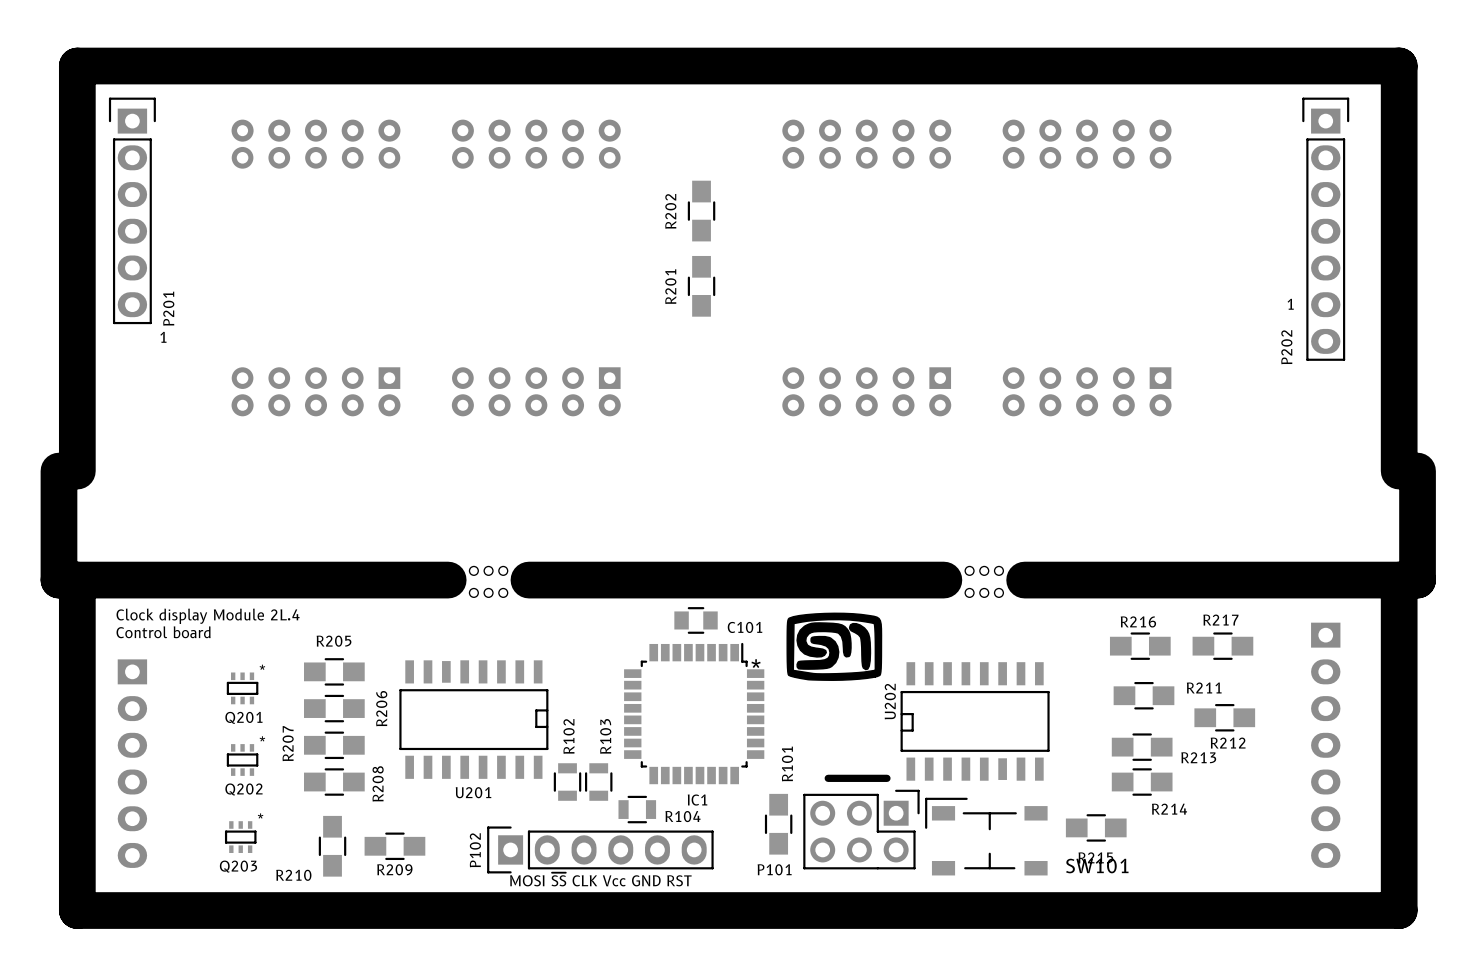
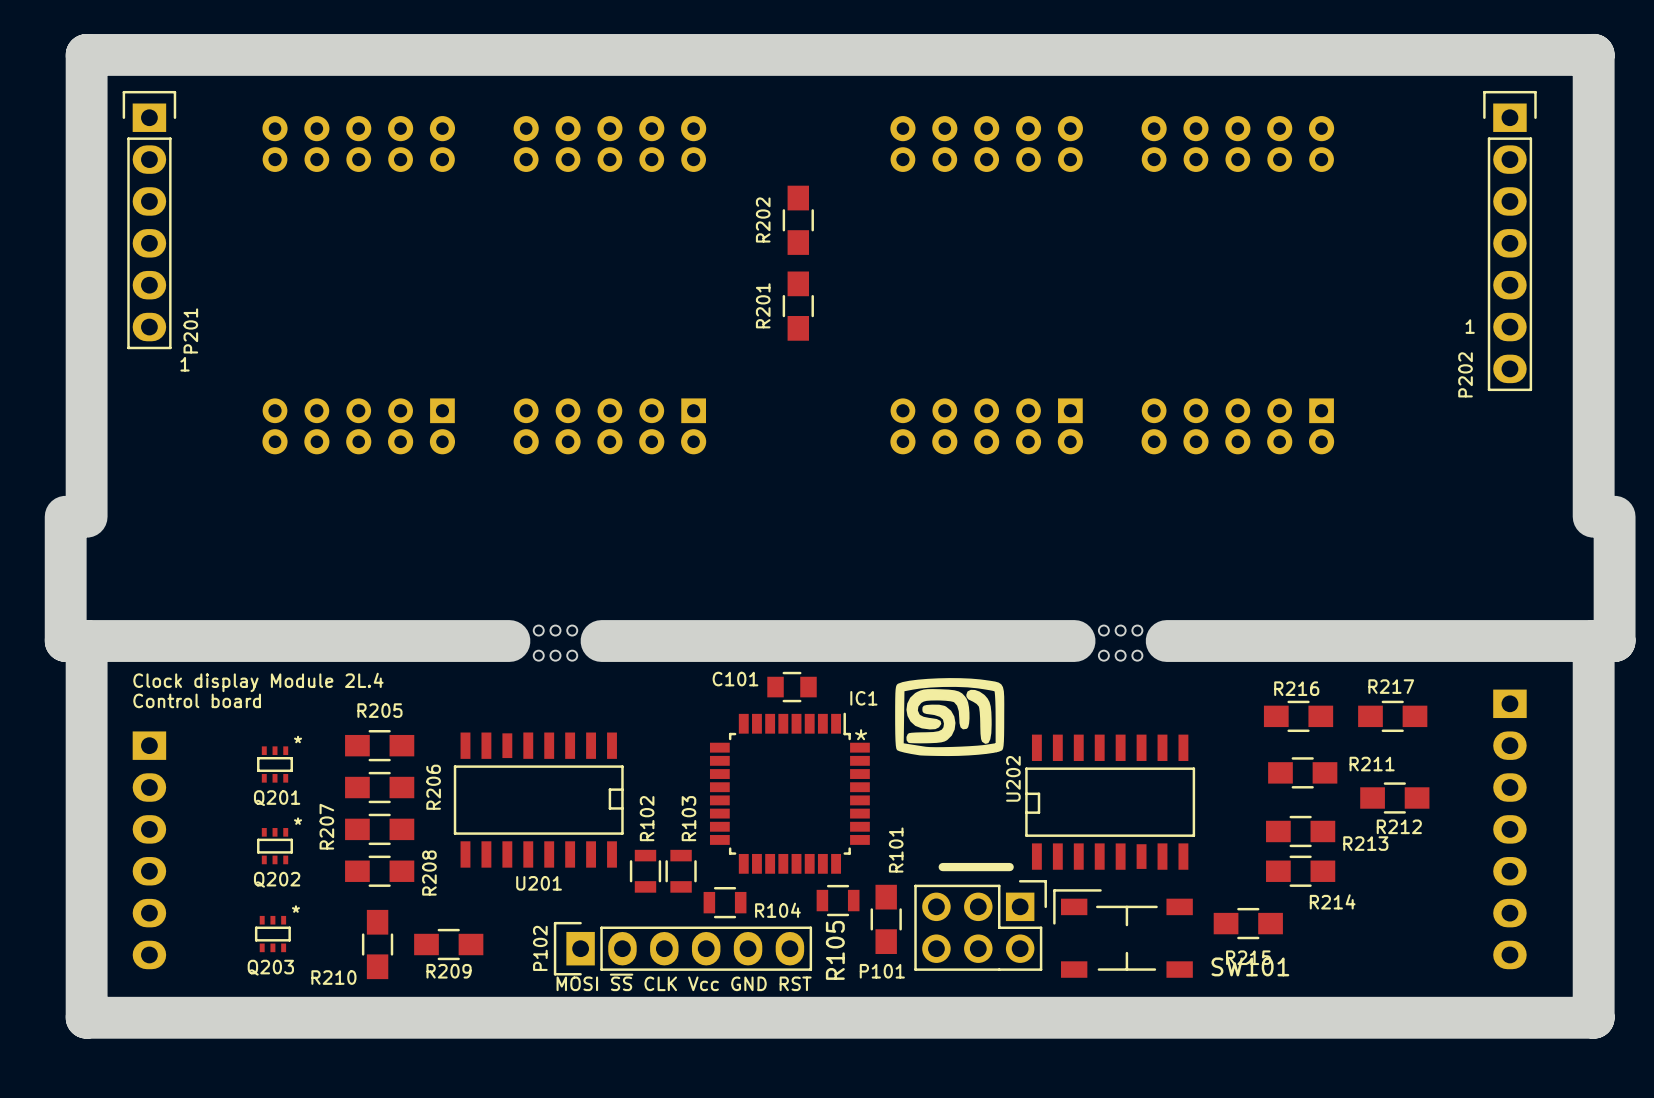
C101 name position: C101 (745, 627) -> C101 (735, 679)
IC1 name position: IC1 (697, 800) -> IC1 (863, 698)
R105: none -> (838, 900)

